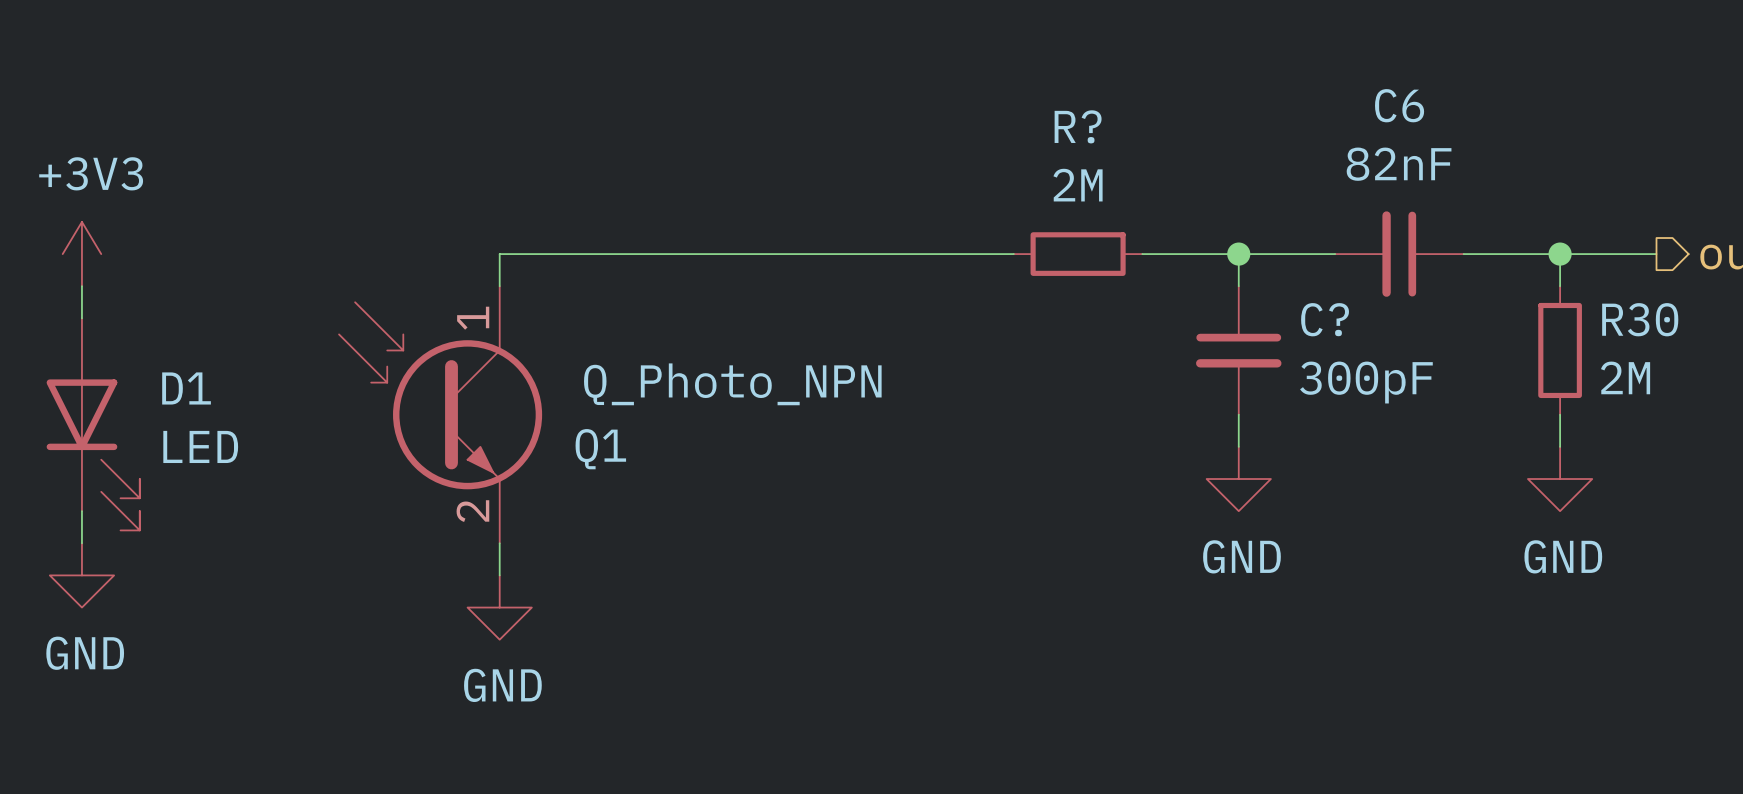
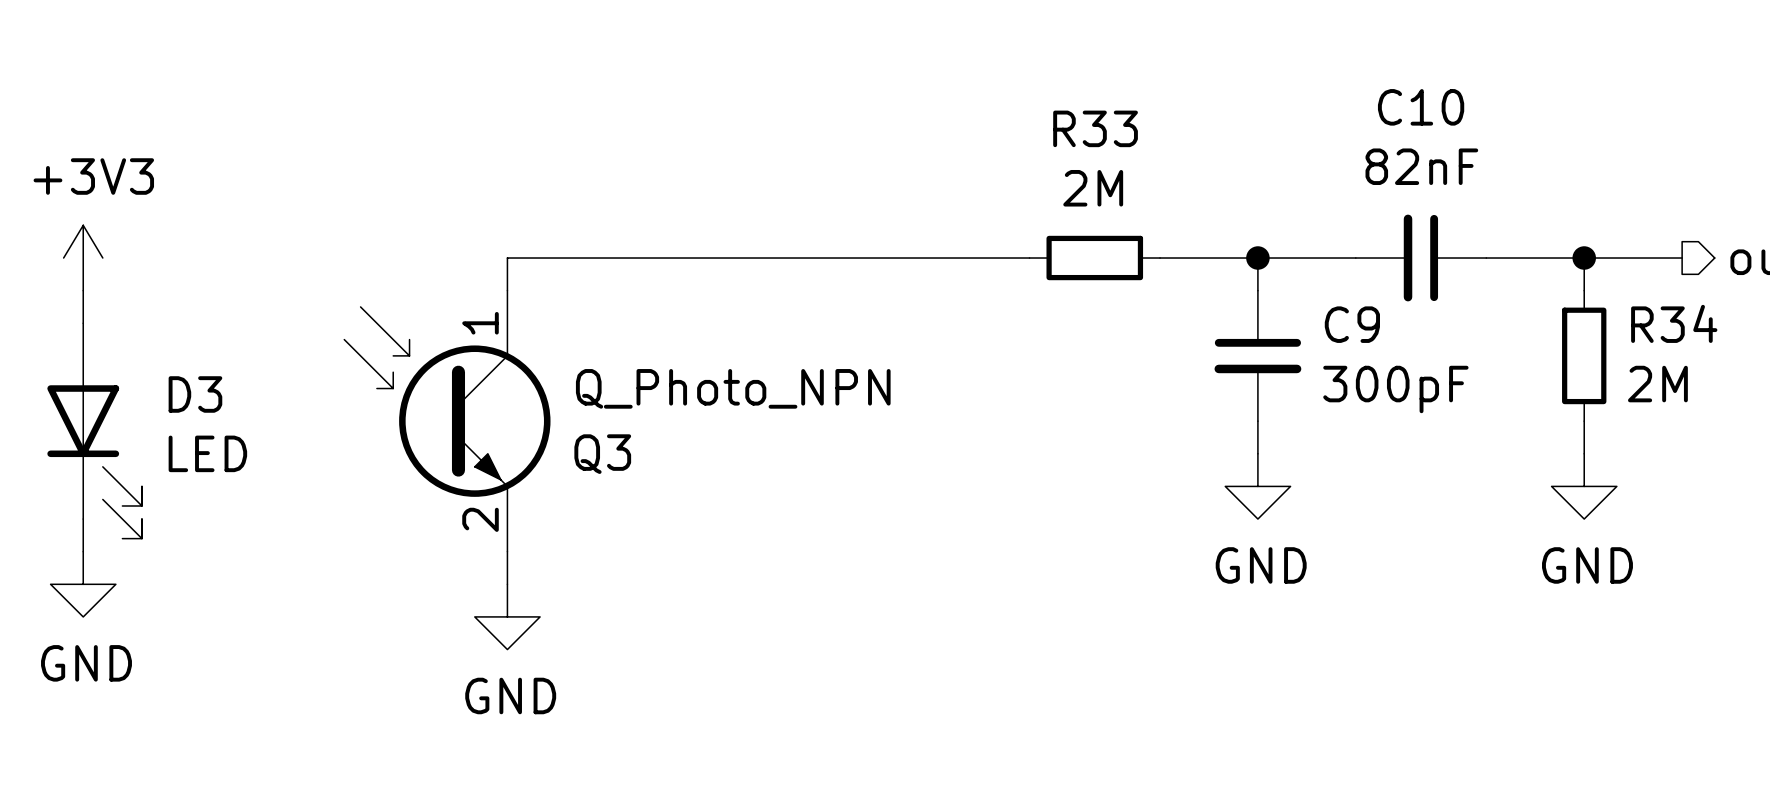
C6 name: C6 (1399, 105) -> C10 (1421, 107)
R? name: R? (1078, 126) -> R33 (1095, 128)
C? name: C? (1325, 319) -> C9 (1352, 324)
R30 name: R30 (1640, 319) -> R34 (1674, 323)
D1 name: D1 (186, 388) -> D3 (195, 394)
Q1 name: Q1 (600, 449) -> Q3 (602, 454)

